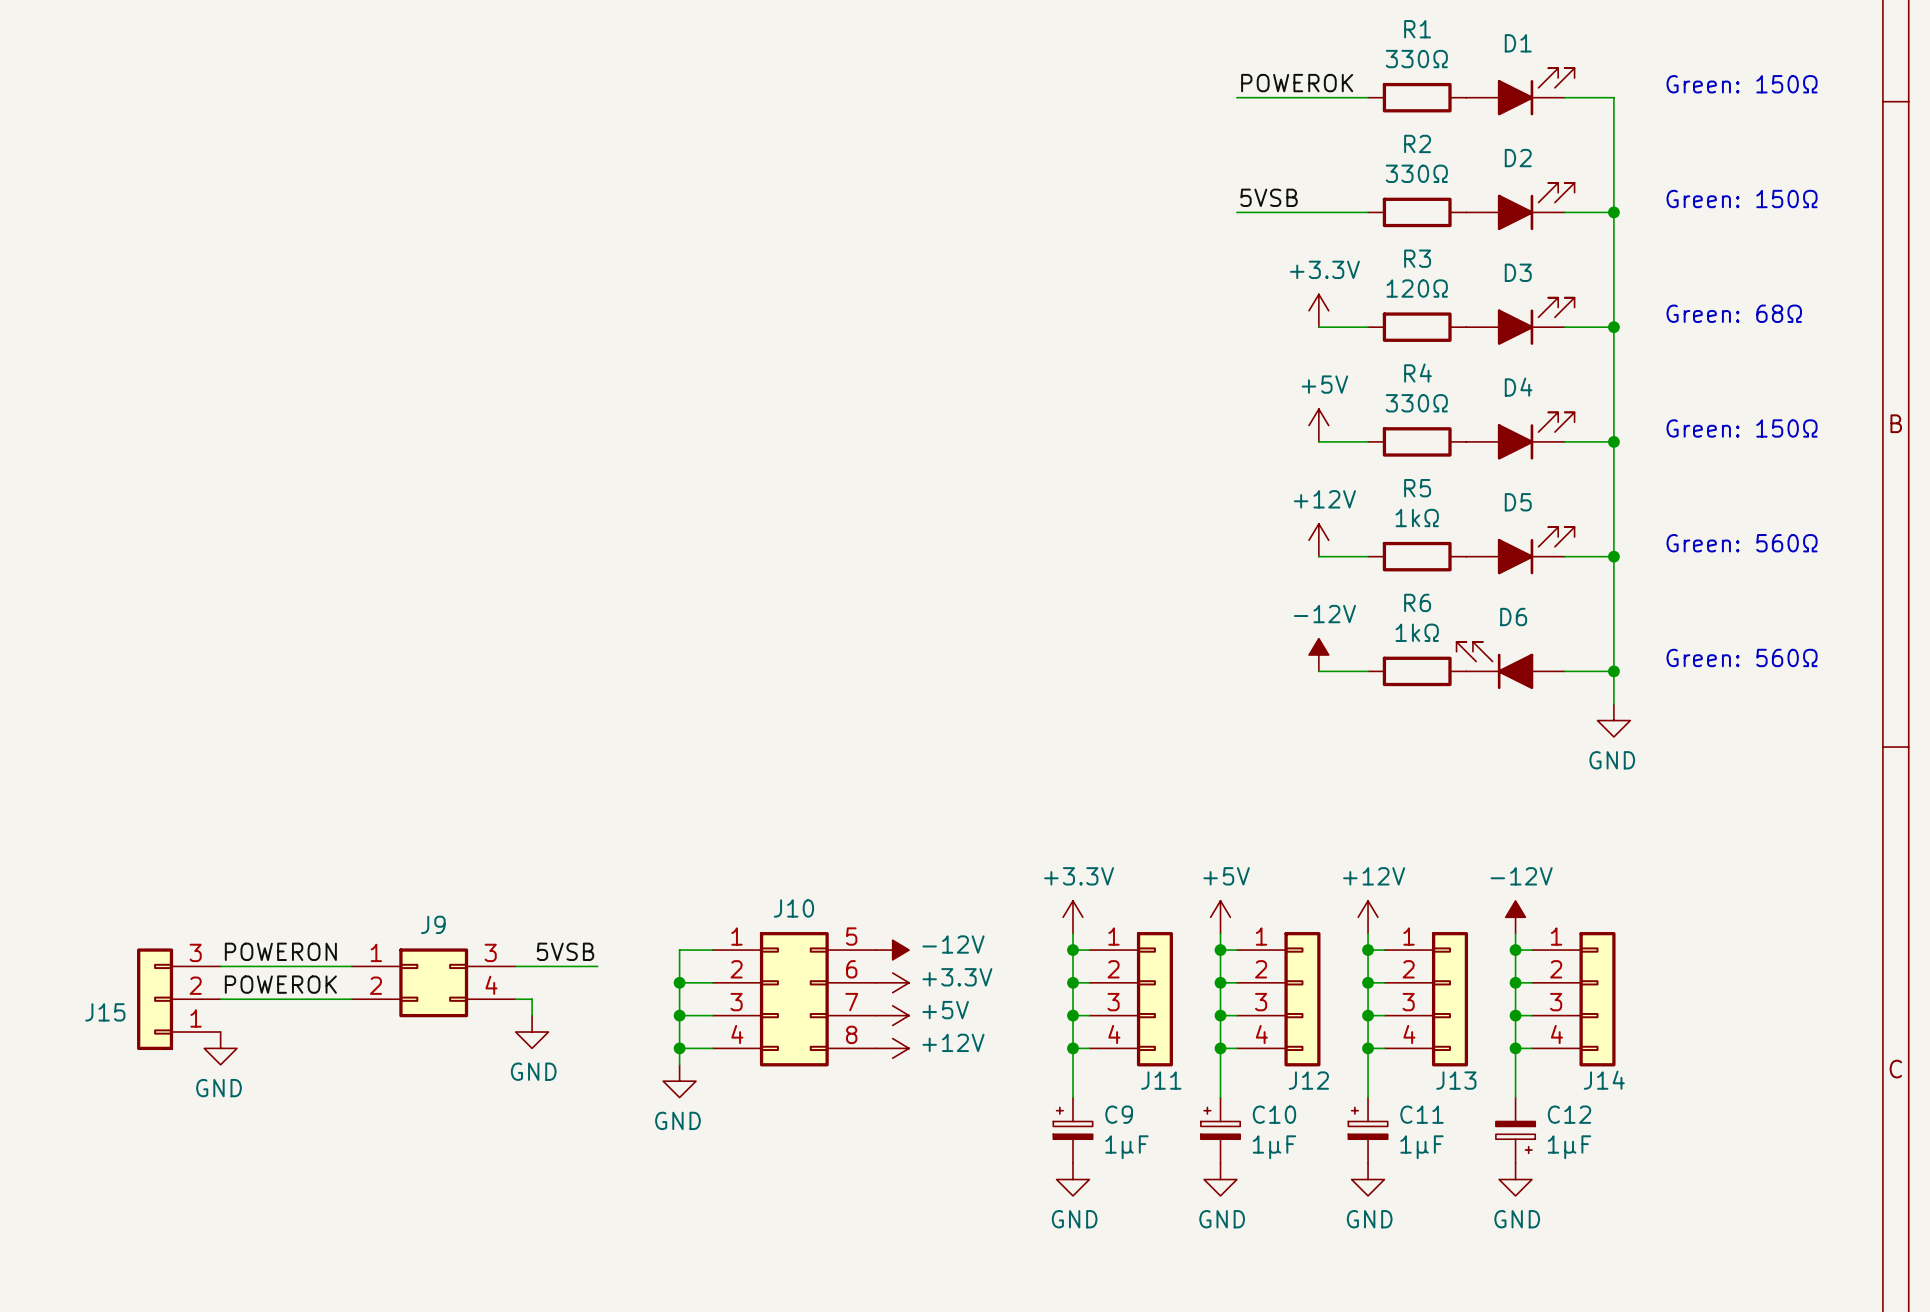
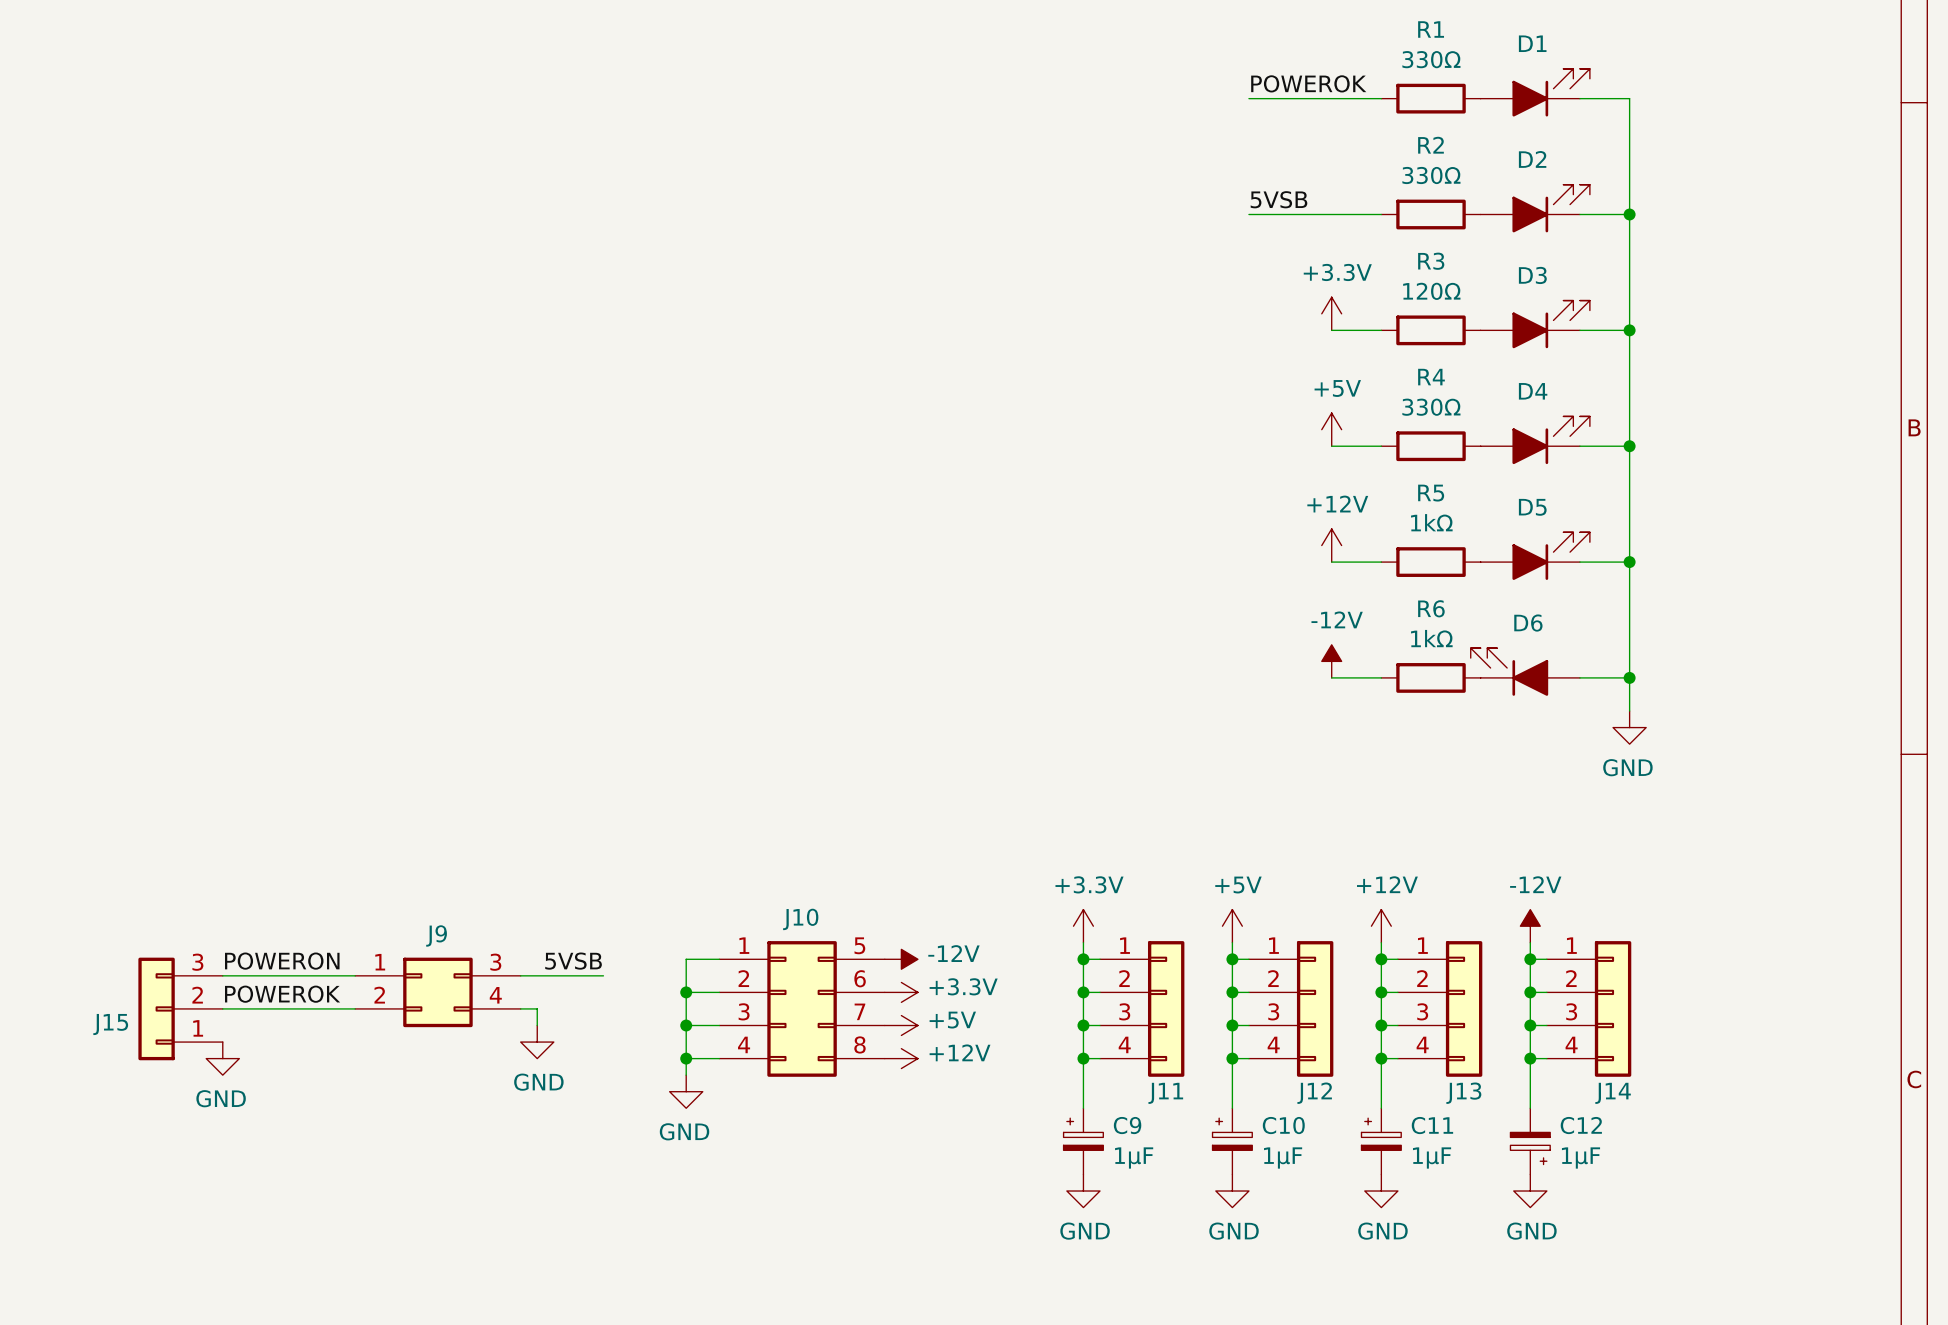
text: Green: 150Ω (1742, 84) -> none
text: Green: 150Ω (1742, 199) -> none
text: Green: 68Ω (1734, 313) -> none
text: Green: 150Ω (1742, 428) -> none
text: Green: 560Ω (1742, 543) -> none
text: Green: 560Ω (1742, 657) -> none

